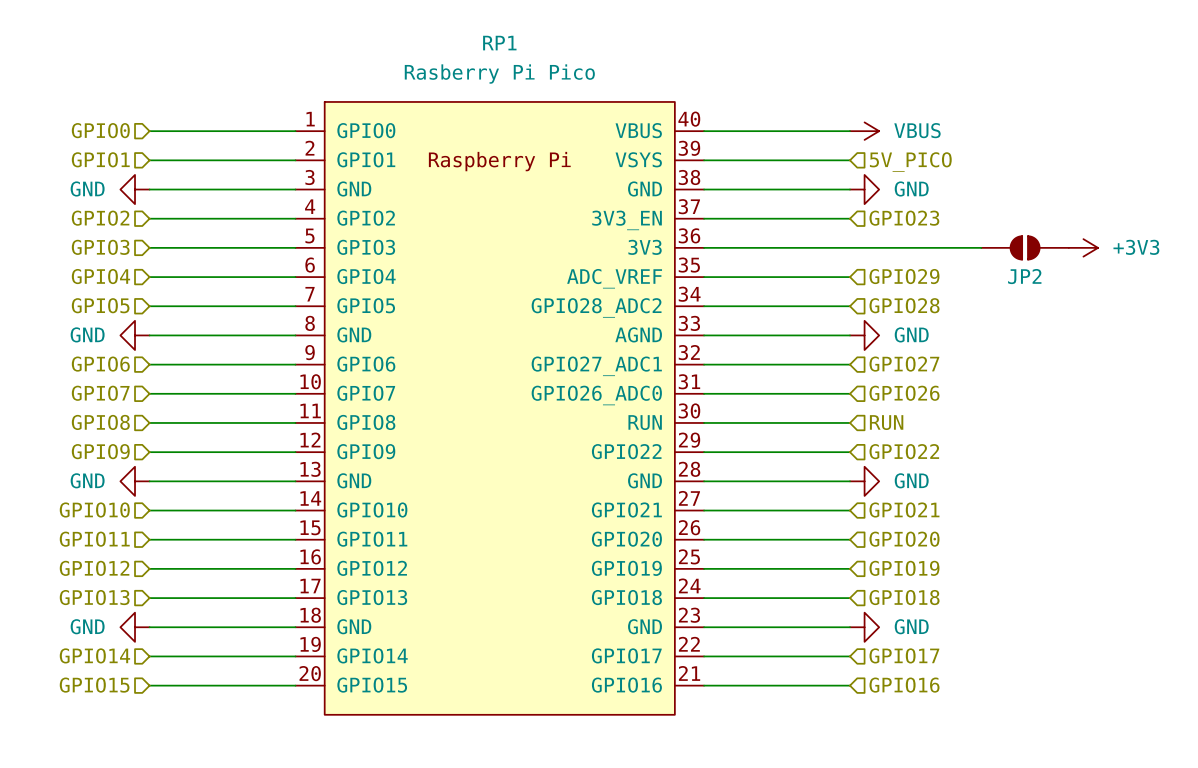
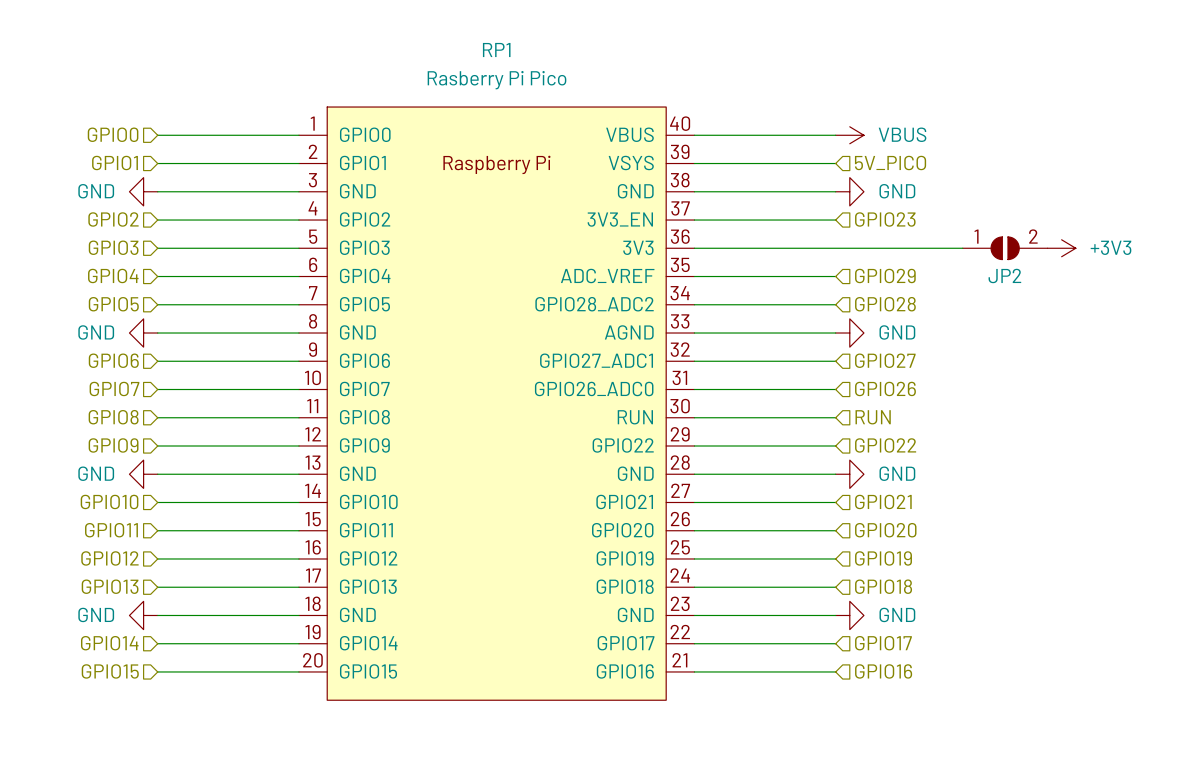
JP2 pin number: none -> 1 (976, 236)
JP2 pin number: none -> 2 (1033, 236)

